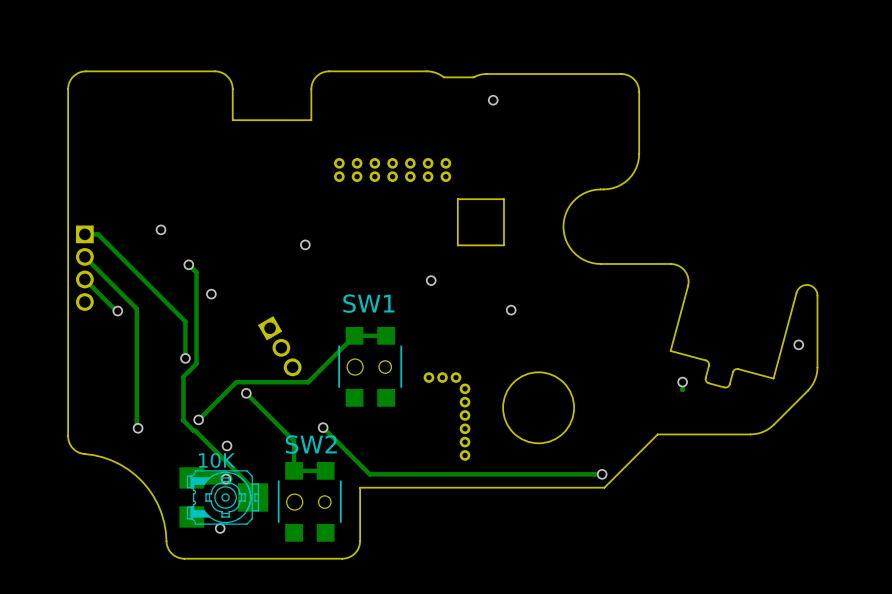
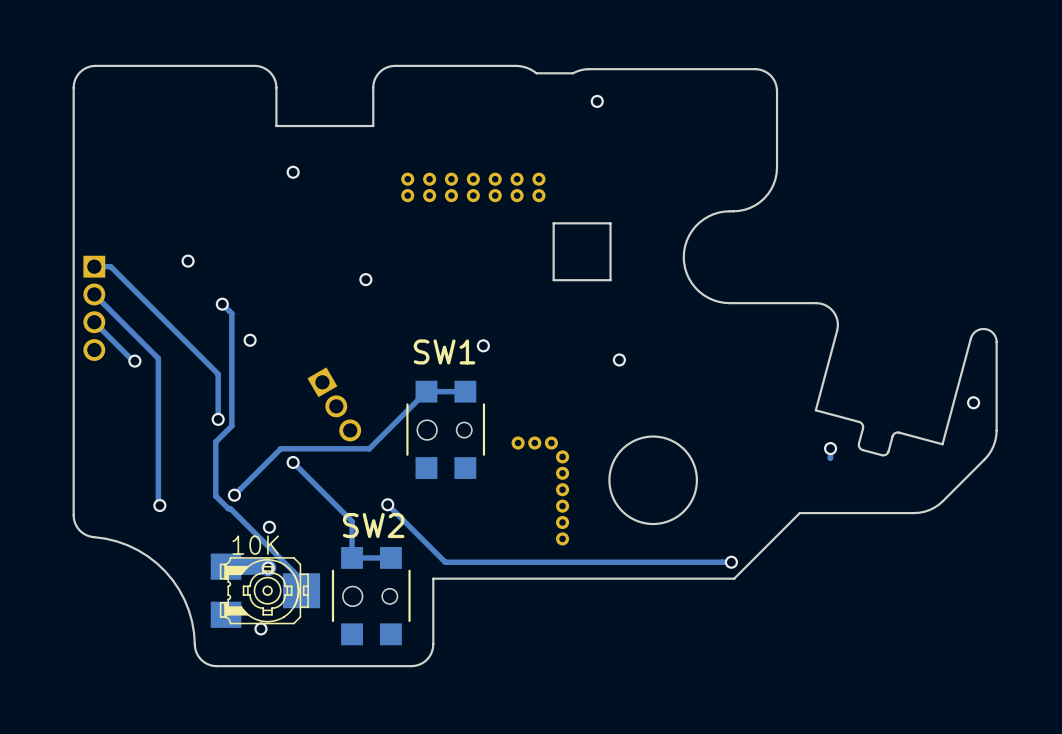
via: none -> (293, 172)
via position: (431, 280) -> (483, 345)

